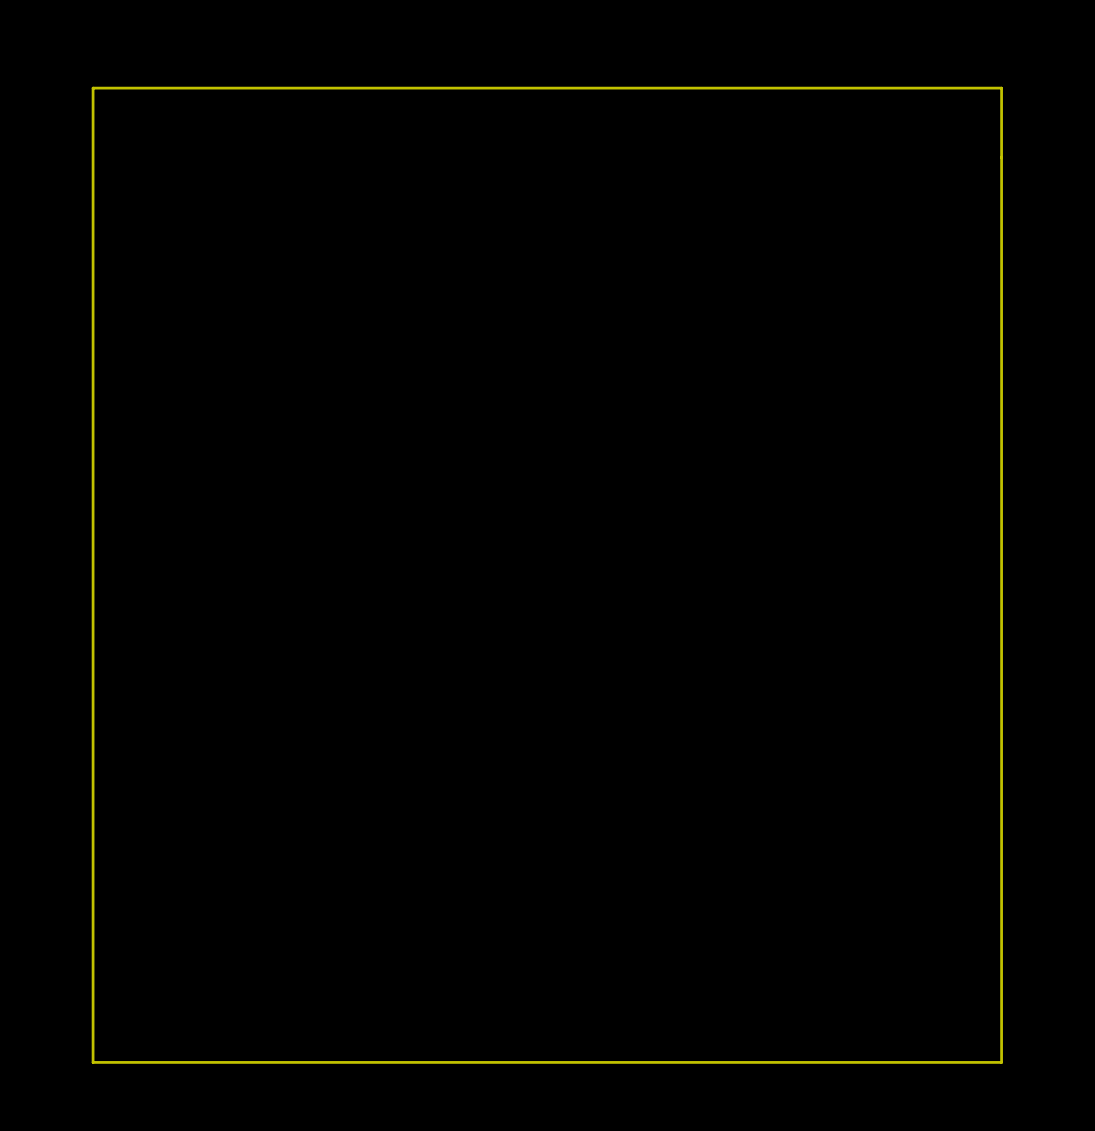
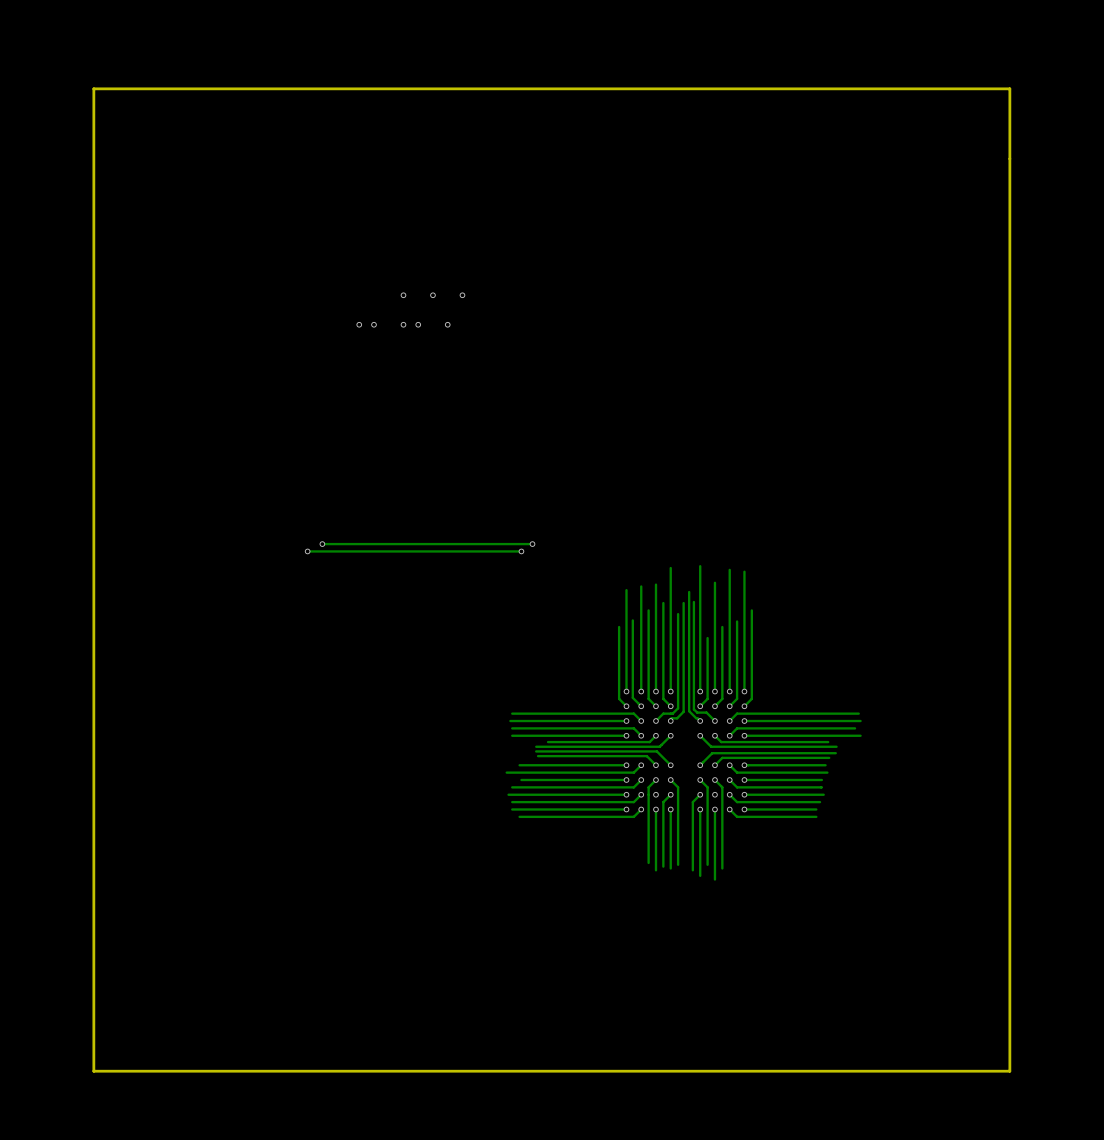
via: none -> (403, 295)
via: none -> (432, 295)
via: none -> (462, 295)
via: none -> (359, 324)
via: none -> (373, 324)
via: none -> (403, 324)
via: none -> (418, 324)
via: none -> (447, 324)
via: none -> (322, 544)
track: none -> (532, 544) (322, 544)
via: none -> (532, 544)
via: none -> (307, 551)
track: none -> (521, 551) (307, 551)
via: none -> (521, 551)
track: none -> (700, 566) (700, 691)
track: none -> (670, 568) (670, 691)
track: none -> (729, 569) (729, 691)
track: none -> (744, 571) (744, 691)
track: none -> (714, 582) (714, 691)
track: none -> (655, 584) (655, 691)
track: none -> (641, 586) (641, 691)
track: none -> (626, 590) (626, 691)
track: none -> (689, 592) (689, 711) (700, 721)
track: none -> (693, 602) (693, 709) (697, 712) (706, 712) (714, 721)
track: none -> (663, 603) (663, 698) (670, 706)
track: none -> (683, 603) (683, 711) (677, 718) (671, 718) (670, 721)
track: none -> (648, 610) (648, 698) (655, 706)
track: none -> (751, 610) (751, 698) (744, 706)
track: none -> (678, 614) (678, 708) (672, 713) (663, 713) (655, 721)
track: none -> (632, 620) (632, 697) (641, 706)
track: none -> (737, 621) (737, 698) (729, 706)
track: none -> (619, 627) (619, 698) (626, 706)
track: none -> (722, 627) (722, 698) (714, 706)
track: none -> (707, 638) (707, 698) (700, 706)
via: none -> (626, 691)
via: none -> (641, 691)
via: none -> (655, 691)
via: none -> (670, 691)
via: none -> (700, 691)
via: none -> (714, 691)
via: none -> (729, 691)
via: none -> (744, 691)
via: none -> (626, 706)
via: none -> (641, 706)
via: none -> (655, 706)
via: none -> (670, 706)
via: none -> (700, 706)
via: none -> (714, 706)
via: none -> (729, 706)
via: none -> (744, 706)
track: none -> (512, 713) (633, 713) (641, 721)
track: none -> (858, 713) (737, 713) (729, 721)
track: none -> (626, 721) (510, 721)
via: none -> (626, 721)
via: none -> (641, 721)
via: none -> (655, 721)
via: none -> (670, 721)
via: none -> (700, 721)
via: none -> (714, 721)
via: none -> (729, 721)
via: none -> (744, 721)
track: none -> (860, 721) (744, 721)
track: none -> (512, 728) (633, 728) (641, 735)
track: none -> (855, 728) (737, 728) (729, 735)
track: none -> (626, 735) (512, 735)
via: none -> (626, 735)
via: none -> (641, 735)
track: none -> (655, 735) (649, 742) (548, 742)
via: none -> (655, 735)
track: none -> (670, 735) (659, 746)
via: none -> (670, 735)
track: none -> (700, 735) (711, 746) (836, 746)
via: none -> (700, 735)
track: none -> (714, 735) (721, 742) (828, 742)
via: none -> (714, 735)
via: none -> (729, 735)
via: none -> (744, 735)
track: none -> (860, 735) (744, 735)
track: none -> (659, 746) (536, 746)
track: none -> (536, 751) (656, 751) (670, 765)
track: none -> (835, 753) (712, 753) (700, 765)
track: none -> (538, 756) (646, 756) (655, 765)
track: none -> (829, 757) (722, 757) (714, 765)
track: none -> (626, 765) (519, 765)
via: none -> (626, 765)
track: none -> (641, 765) (633, 772) (506, 772)
via: none -> (641, 765)
via: none -> (655, 765)
via: none -> (670, 765)
via: none -> (700, 765)
via: none -> (714, 765)
track: none -> (729, 765) (737, 772) (827, 772)
via: none -> (729, 765)
via: none -> (744, 765)
track: none -> (825, 765) (744, 765)
track: none -> (626, 780) (521, 780)
via: none -> (626, 780)
track: none -> (641, 780) (633, 787) (512, 787)
via: none -> (641, 780)
track: none -> (655, 780) (648, 787) (648, 862)
via: none -> (655, 780)
track: none -> (670, 780) (678, 787) (678, 864)
via: none -> (670, 780)
track: none -> (700, 780) (707, 787) (707, 864)
via: none -> (700, 780)
track: none -> (714, 780) (722, 787) (722, 868)
via: none -> (714, 780)
track: none -> (729, 780) (737, 787) (821, 787)
via: none -> (729, 780)
via: none -> (744, 780)
track: none -> (821, 780) (744, 780)
track: none -> (626, 794) (508, 794)
via: none -> (626, 794)
track: none -> (641, 794) (633, 802) (512, 802)
via: none -> (641, 794)
via: none -> (655, 794)
track: none -> (670, 794) (663, 802) (663, 866)
via: none -> (670, 794)
track: none -> (700, 794) (692, 802) (692, 870)
via: none -> (700, 794)
via: none -> (714, 794)
track: none -> (729, 794) (737, 802) (820, 802)
via: none -> (729, 794)
via: none -> (744, 794)
track: none -> (823, 794) (744, 794)
track: none -> (626, 809) (512, 809)
via: none -> (626, 809)
track: none -> (641, 809) (633, 816) (519, 816)
via: none -> (641, 809)
track: none -> (655, 809) (655, 870)
via: none -> (655, 809)
track: none -> (670, 809) (670, 868)
via: none -> (670, 809)
track: none -> (700, 809) (700, 875)
via: none -> (700, 809)
track: none -> (714, 809) (714, 879)
via: none -> (714, 809)
track: none -> (729, 809) (737, 816) (816, 816)
via: none -> (729, 809)
via: none -> (744, 809)
track: none -> (816, 809) (744, 809)

